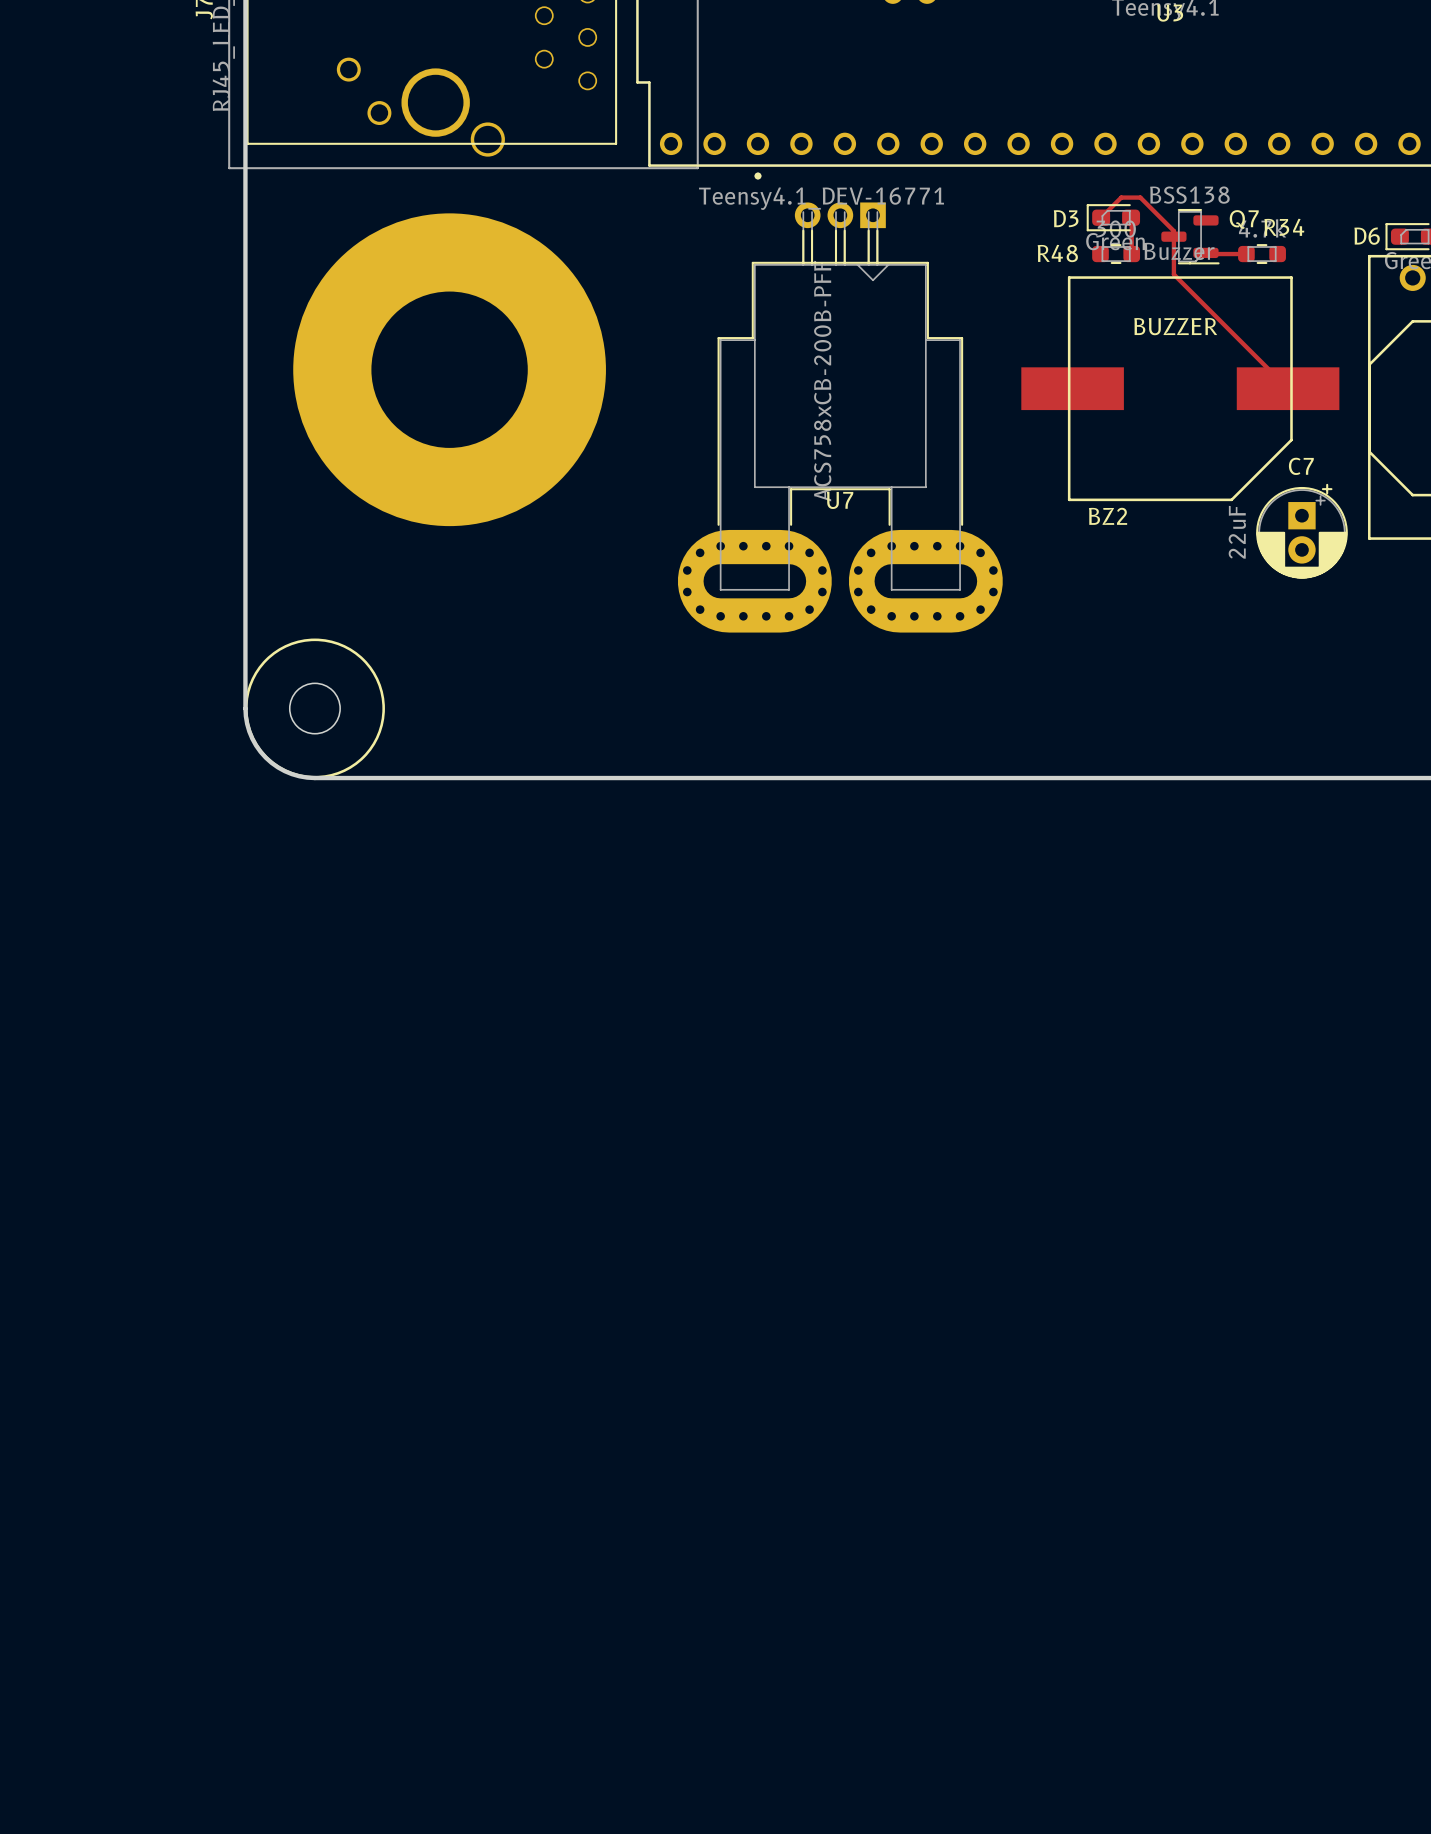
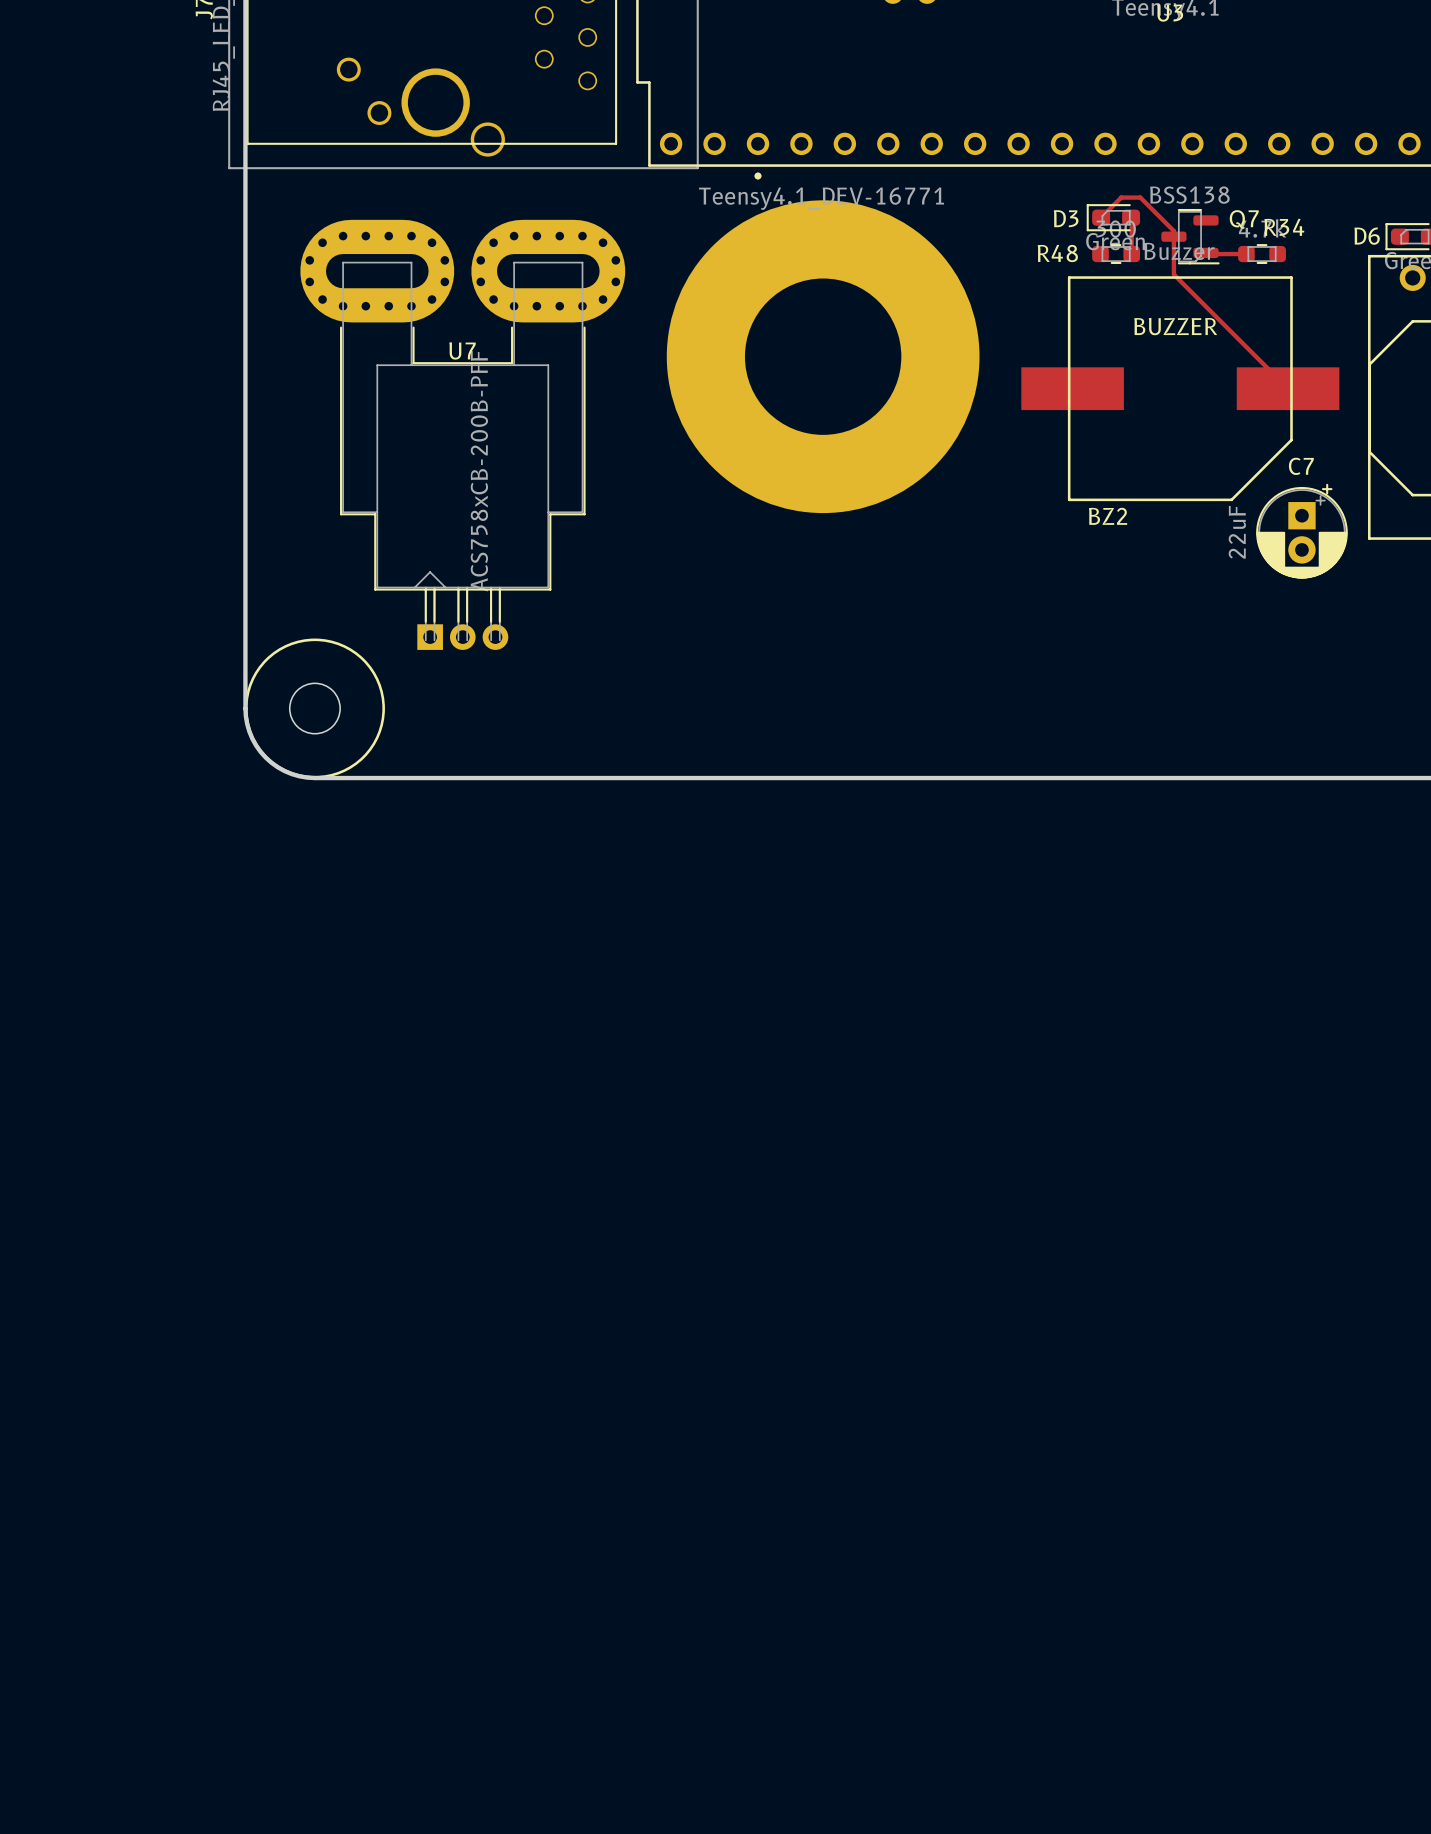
part position: (449, 369) -> (823, 356)
U7 rotation: 0° (840, 417) -> 180° (462, 434)
U7 position: (840, 417) -> (462, 434)

